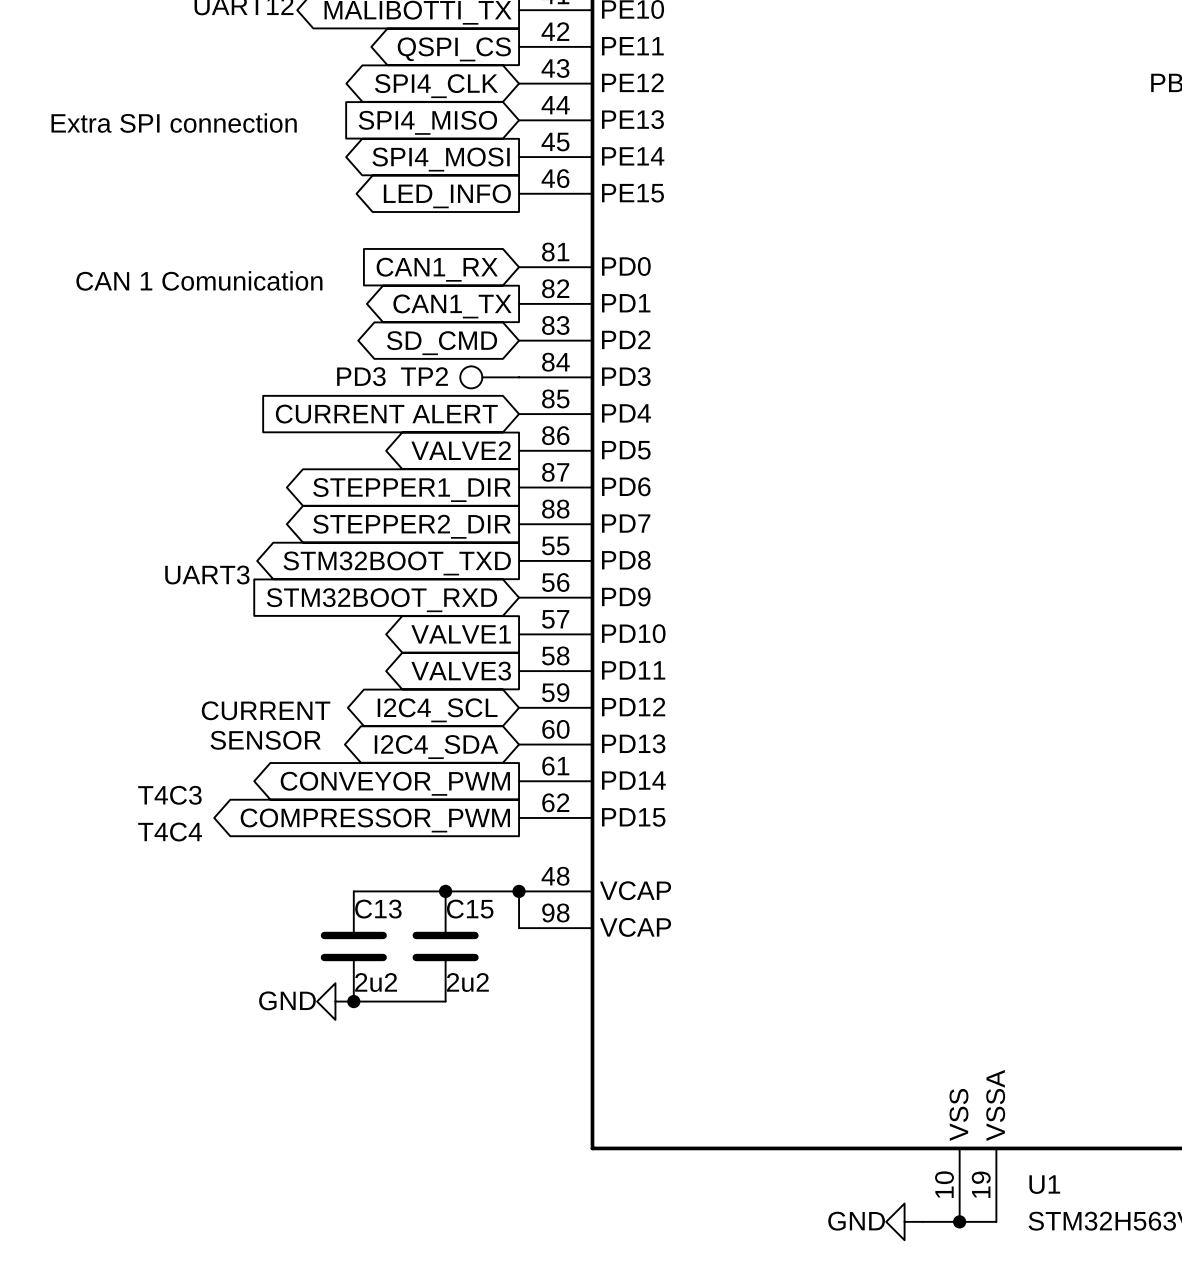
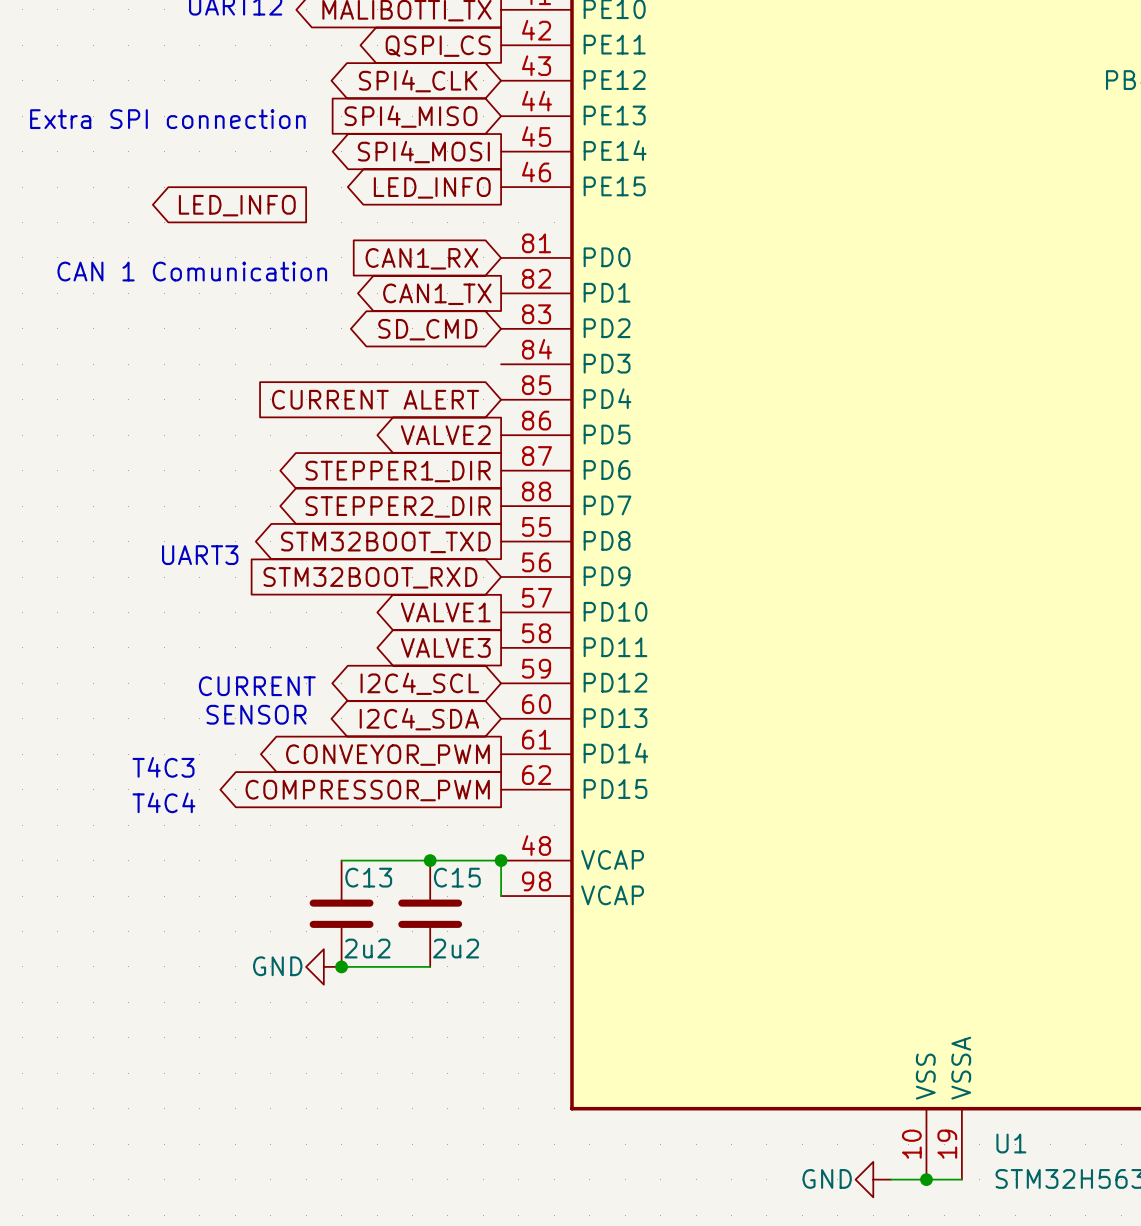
global label: none -> LED_INFO (237, 205)
TP2: PD3 (489, 377) -> none

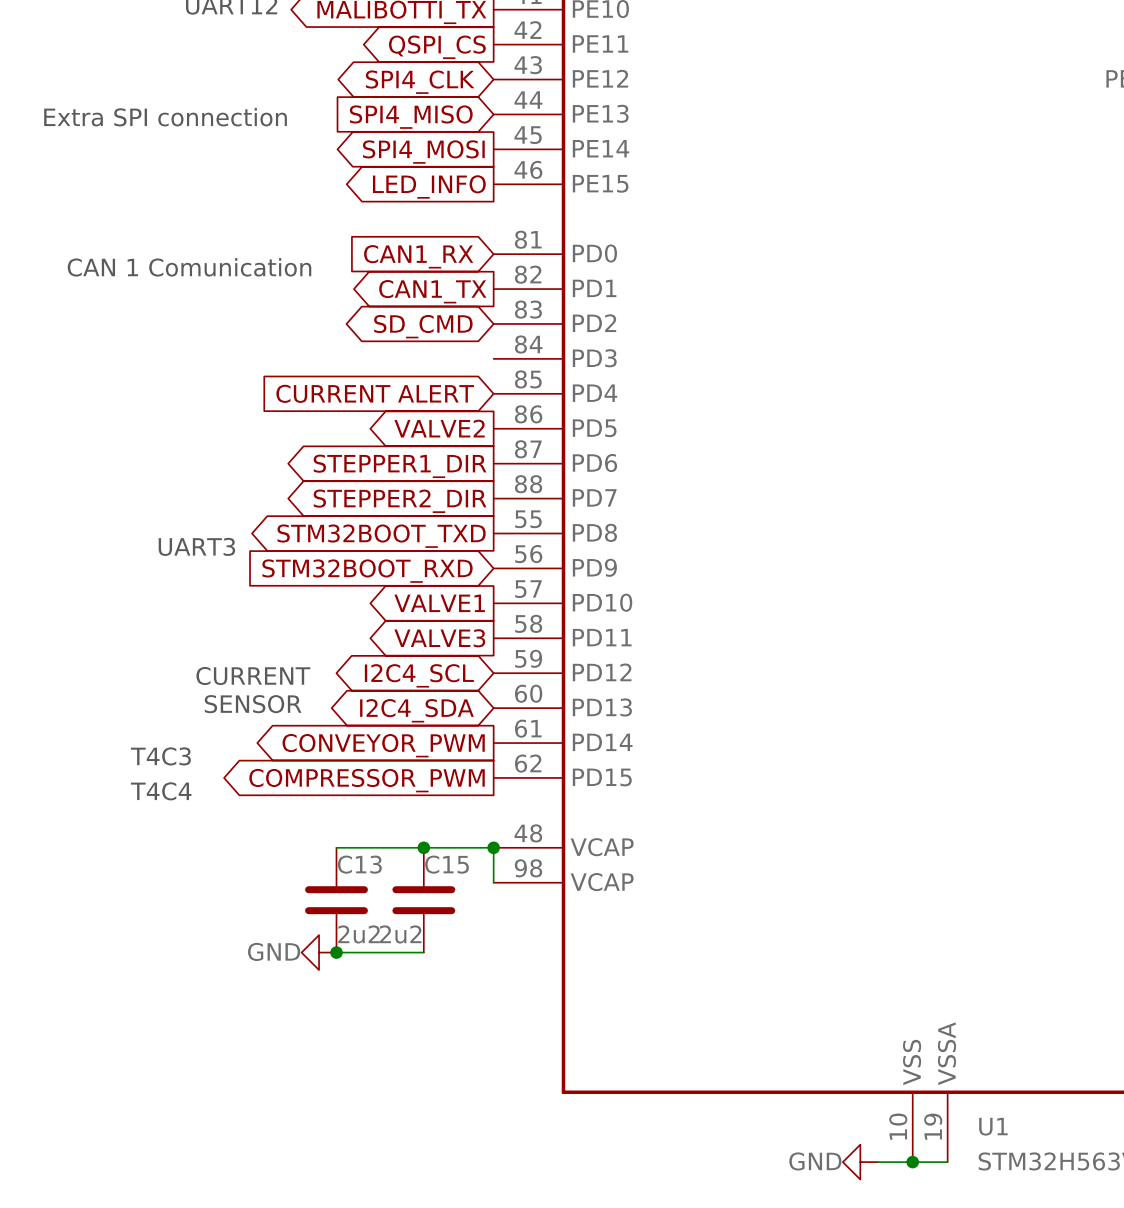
global label: LED_INFO (237, 205) -> none
C15 value position: 2u2 (456, 948) -> 2u2 (400, 934)

